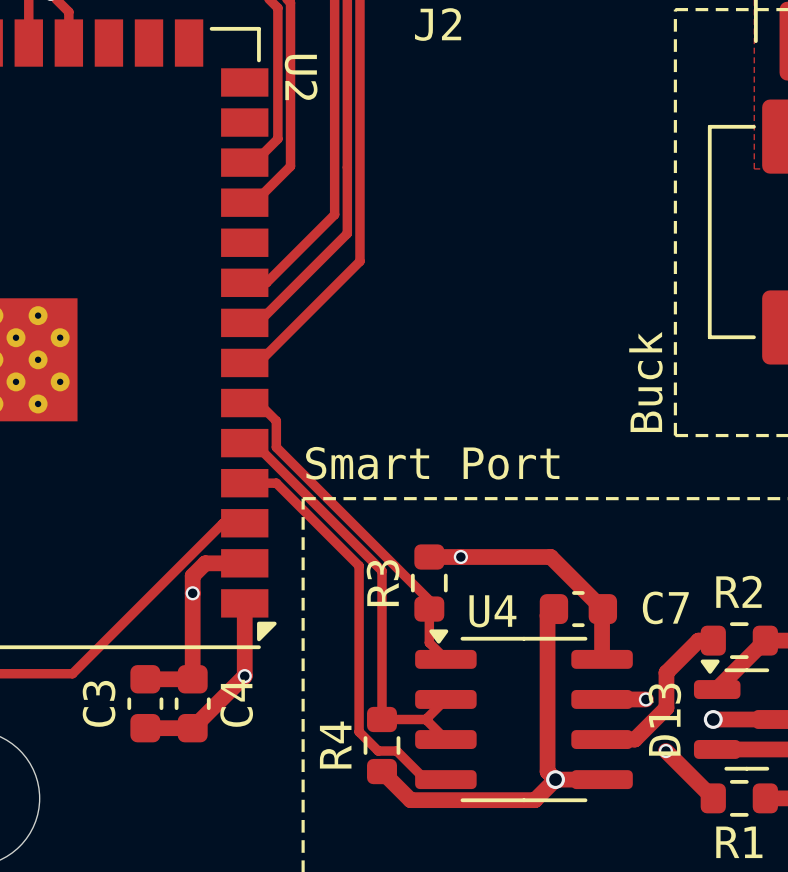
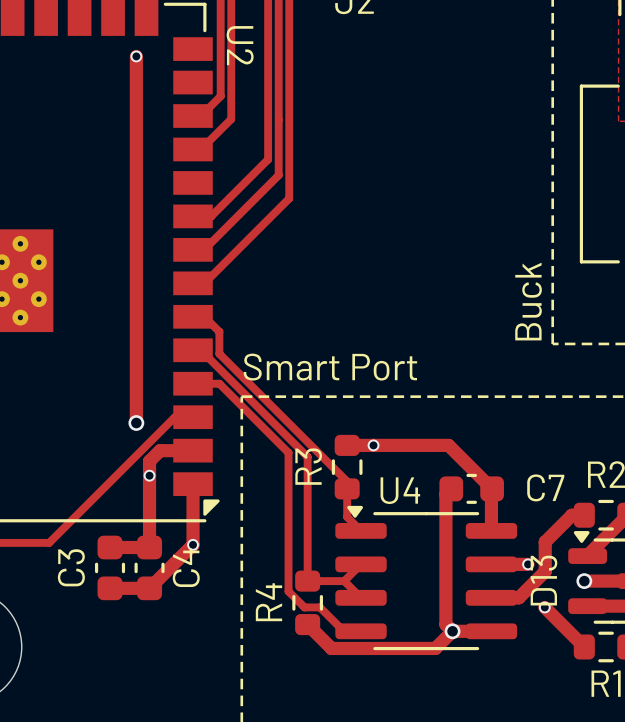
track: none -> (136, 56) (136, 423)
via: none -> (136, 56)
via: none -> (136, 423)

